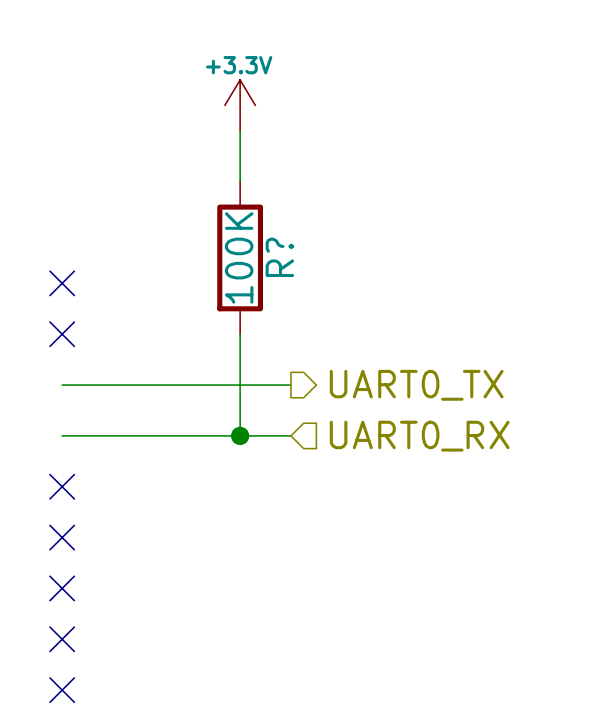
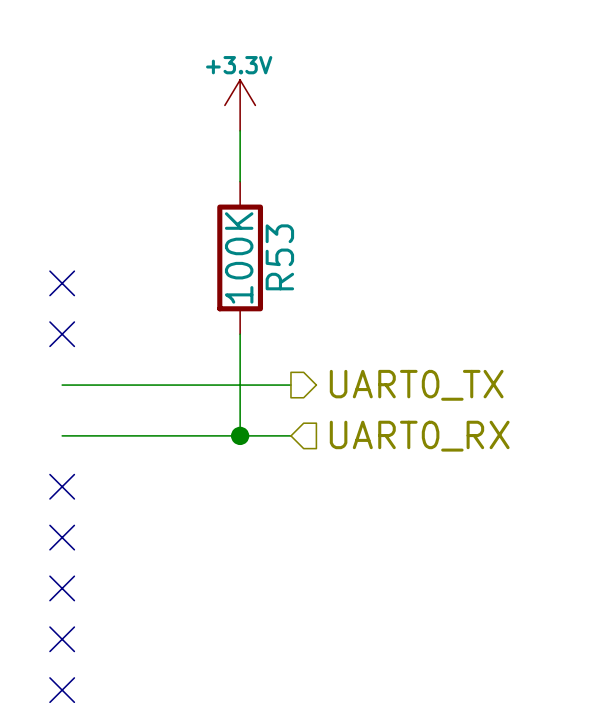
R? name: R? (279, 257) -> R53 (279, 257)

